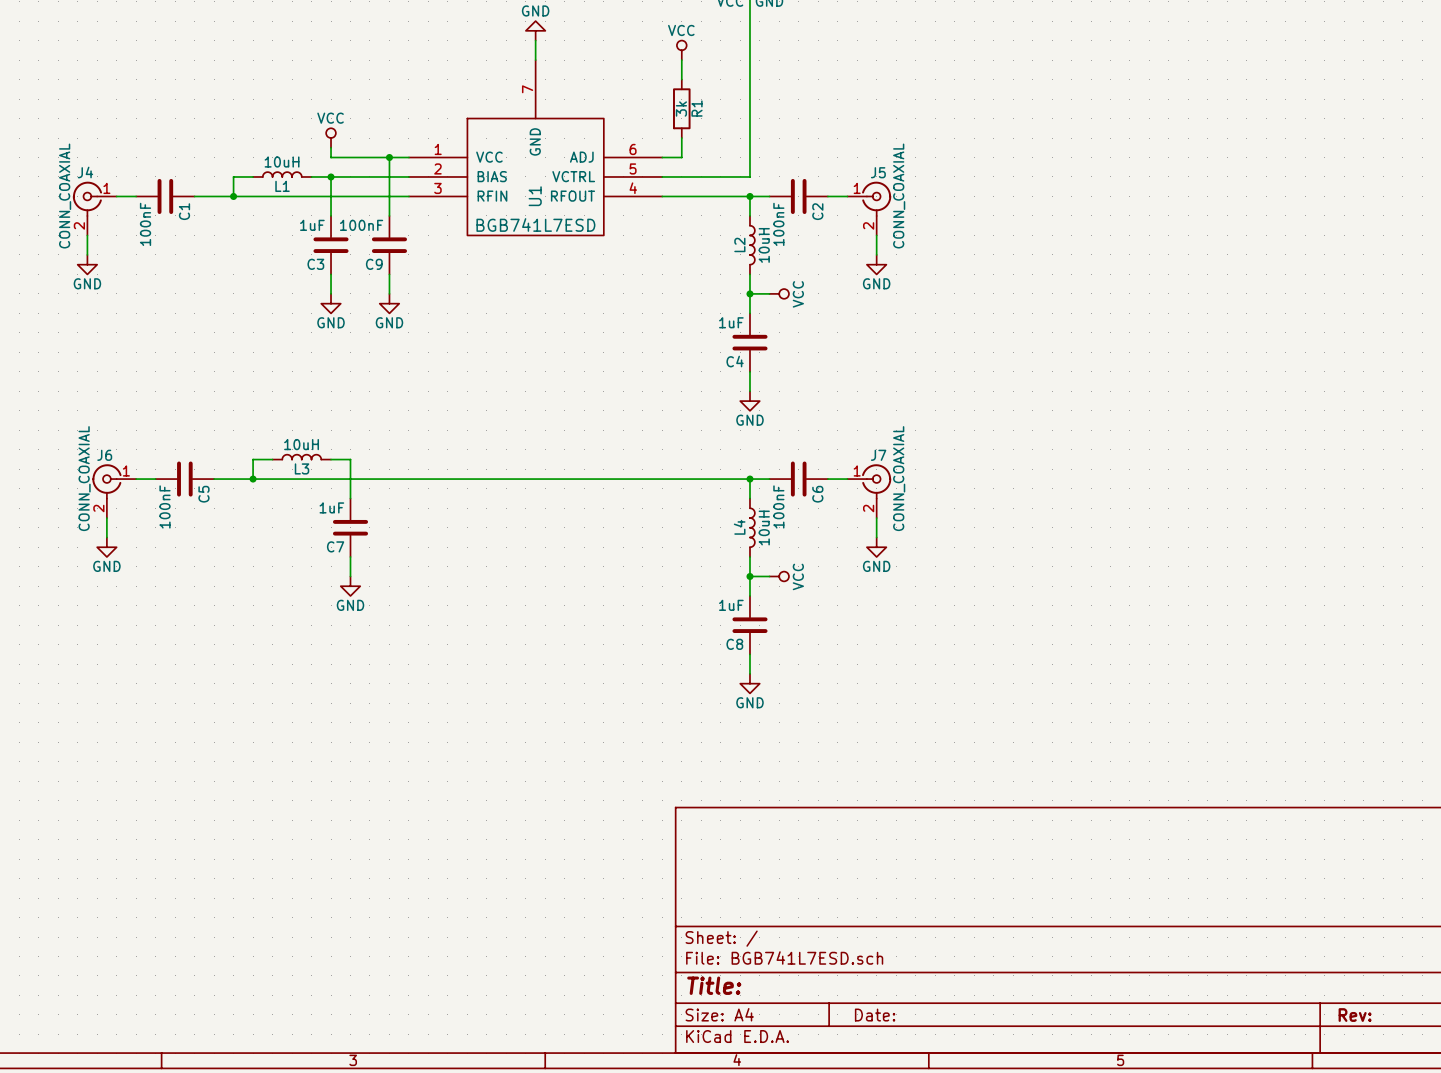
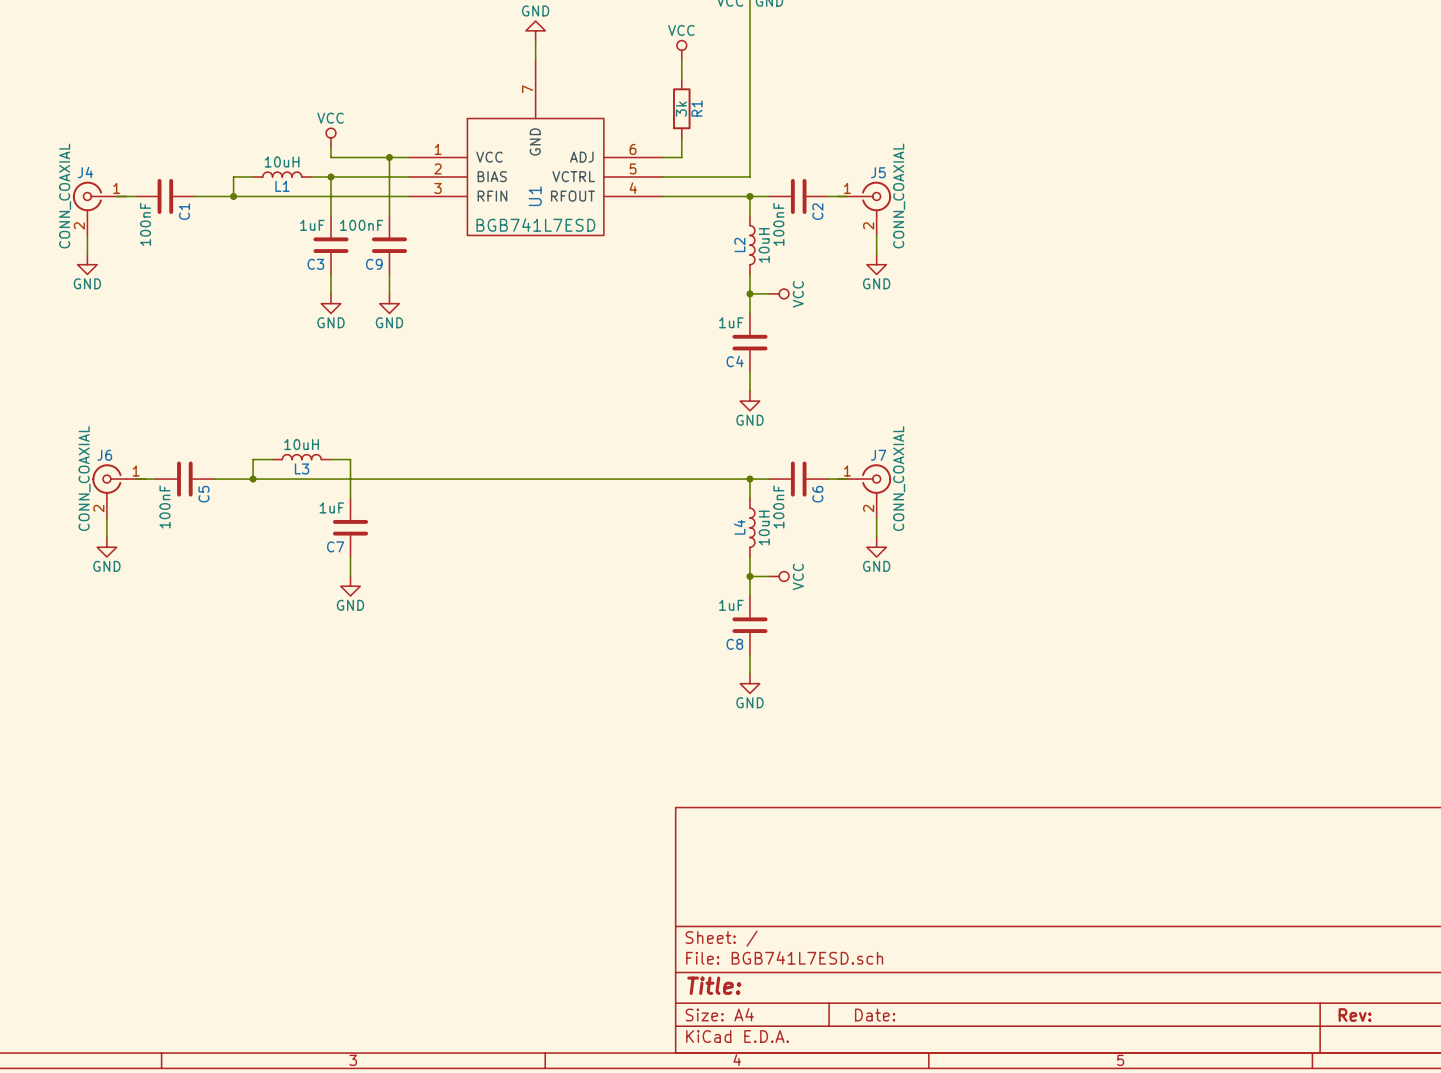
J4 symbol: [72, 181, 117, 236] -> [72, 181, 127, 236]
J5 symbol: [847, 181, 892, 236] -> [837, 181, 892, 236]
J6 symbol: [92, 464, 137, 519] -> [92, 464, 146, 519]
J7 symbol: [847, 464, 892, 519] -> [837, 464, 892, 519]

